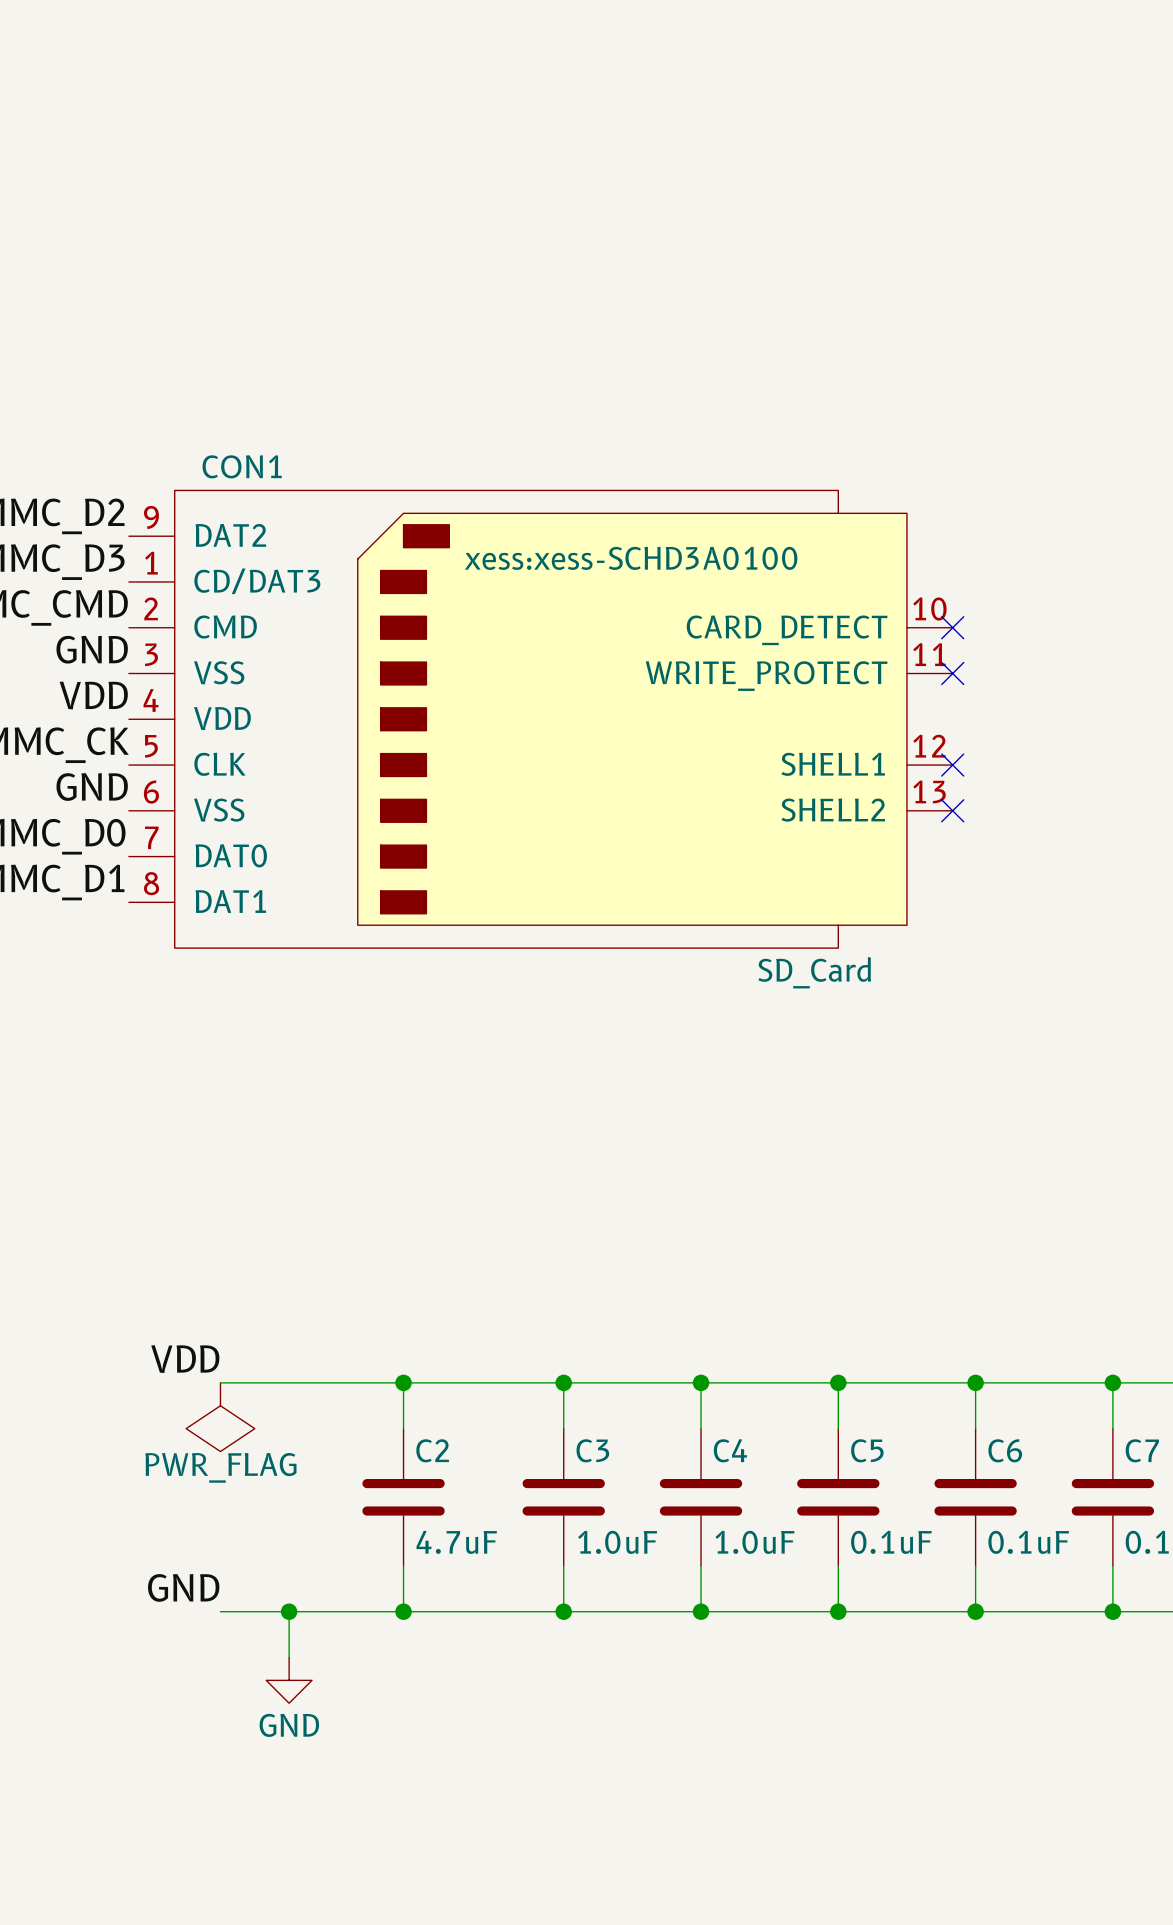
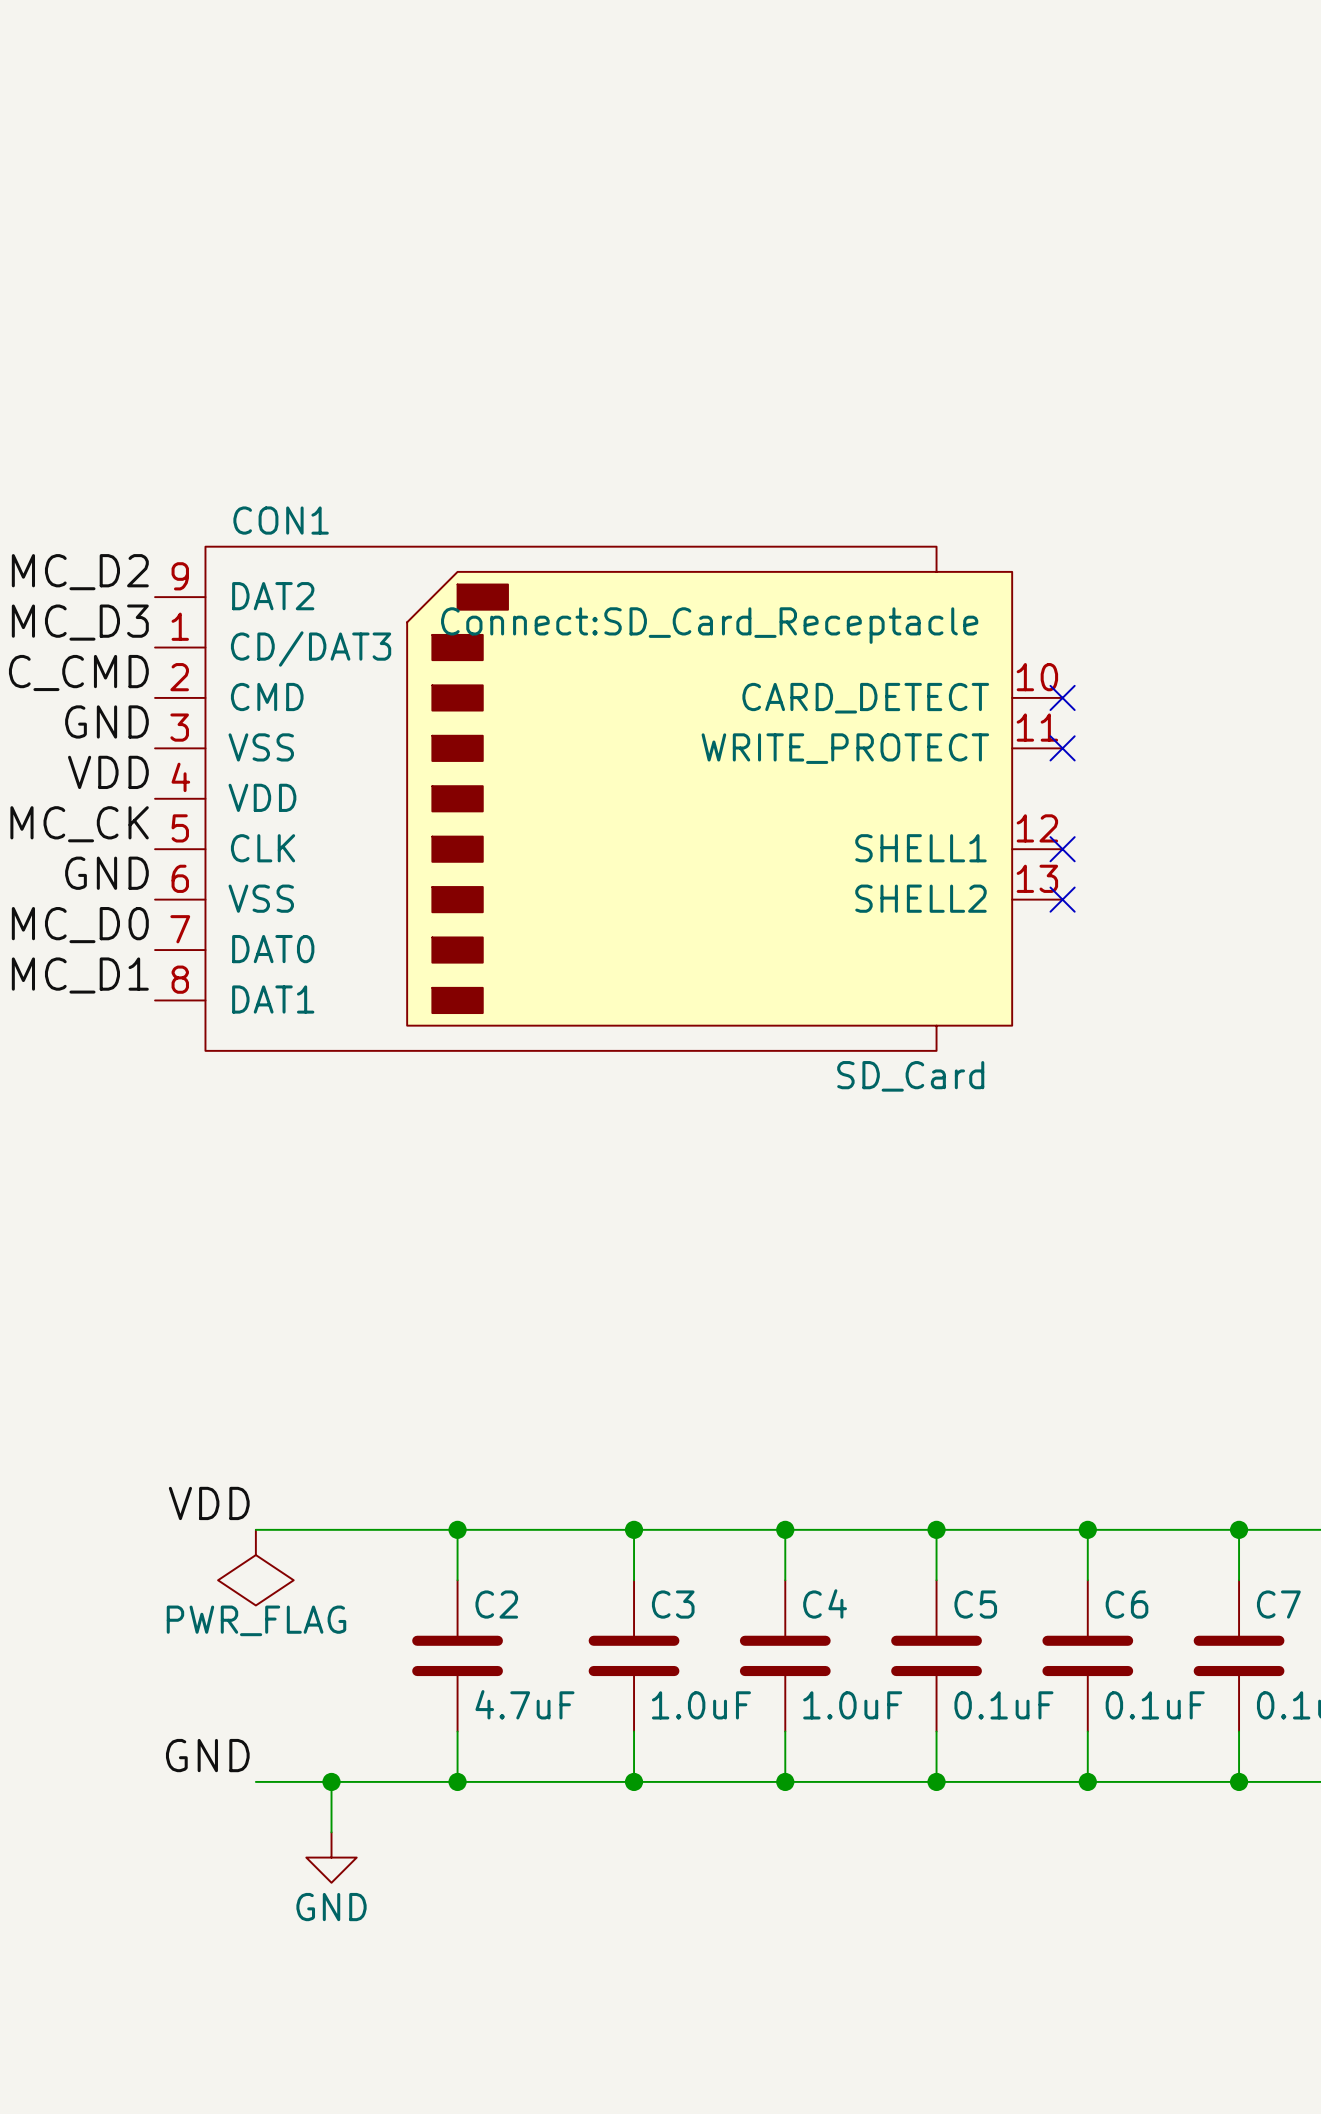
CON1 text: xess:xess-SCHD3A0100 (631, 558) -> Connect:SD_Card_Receptacle (709, 625)

